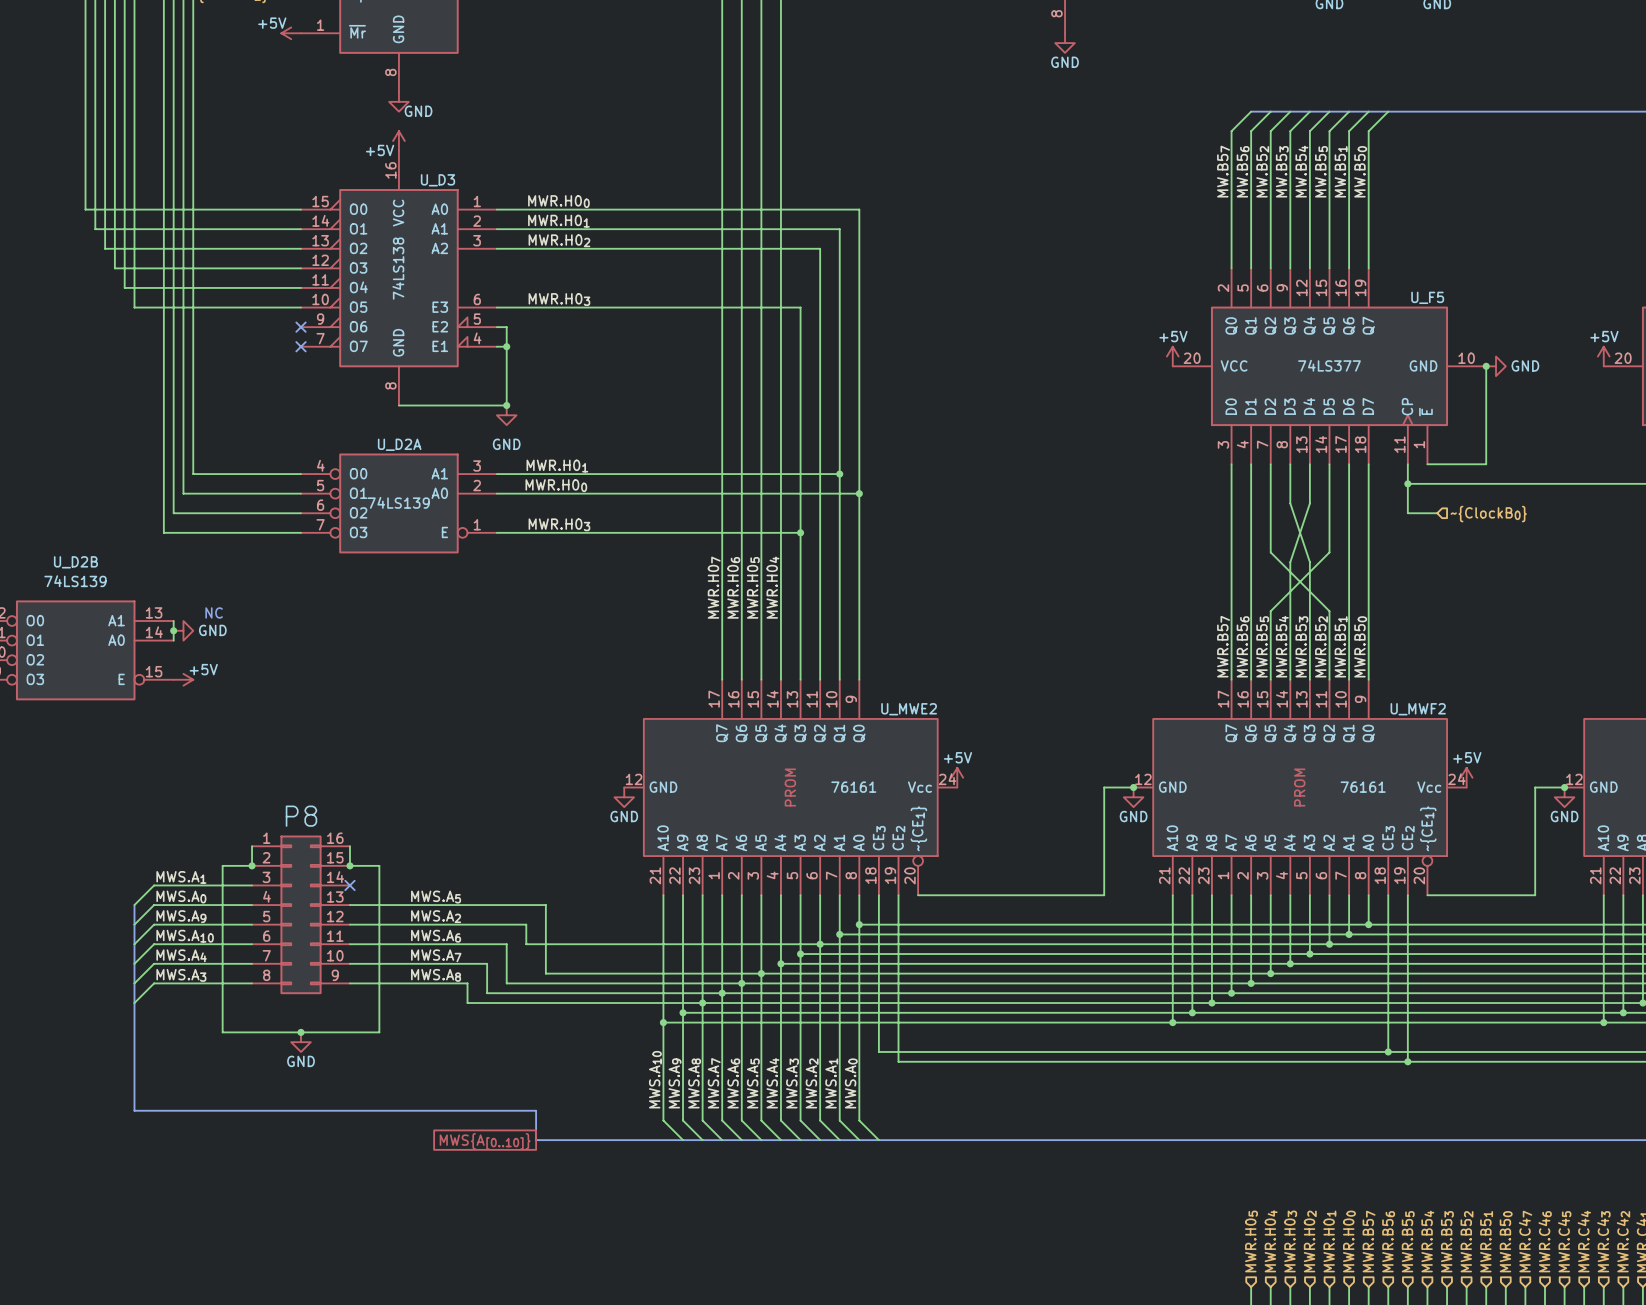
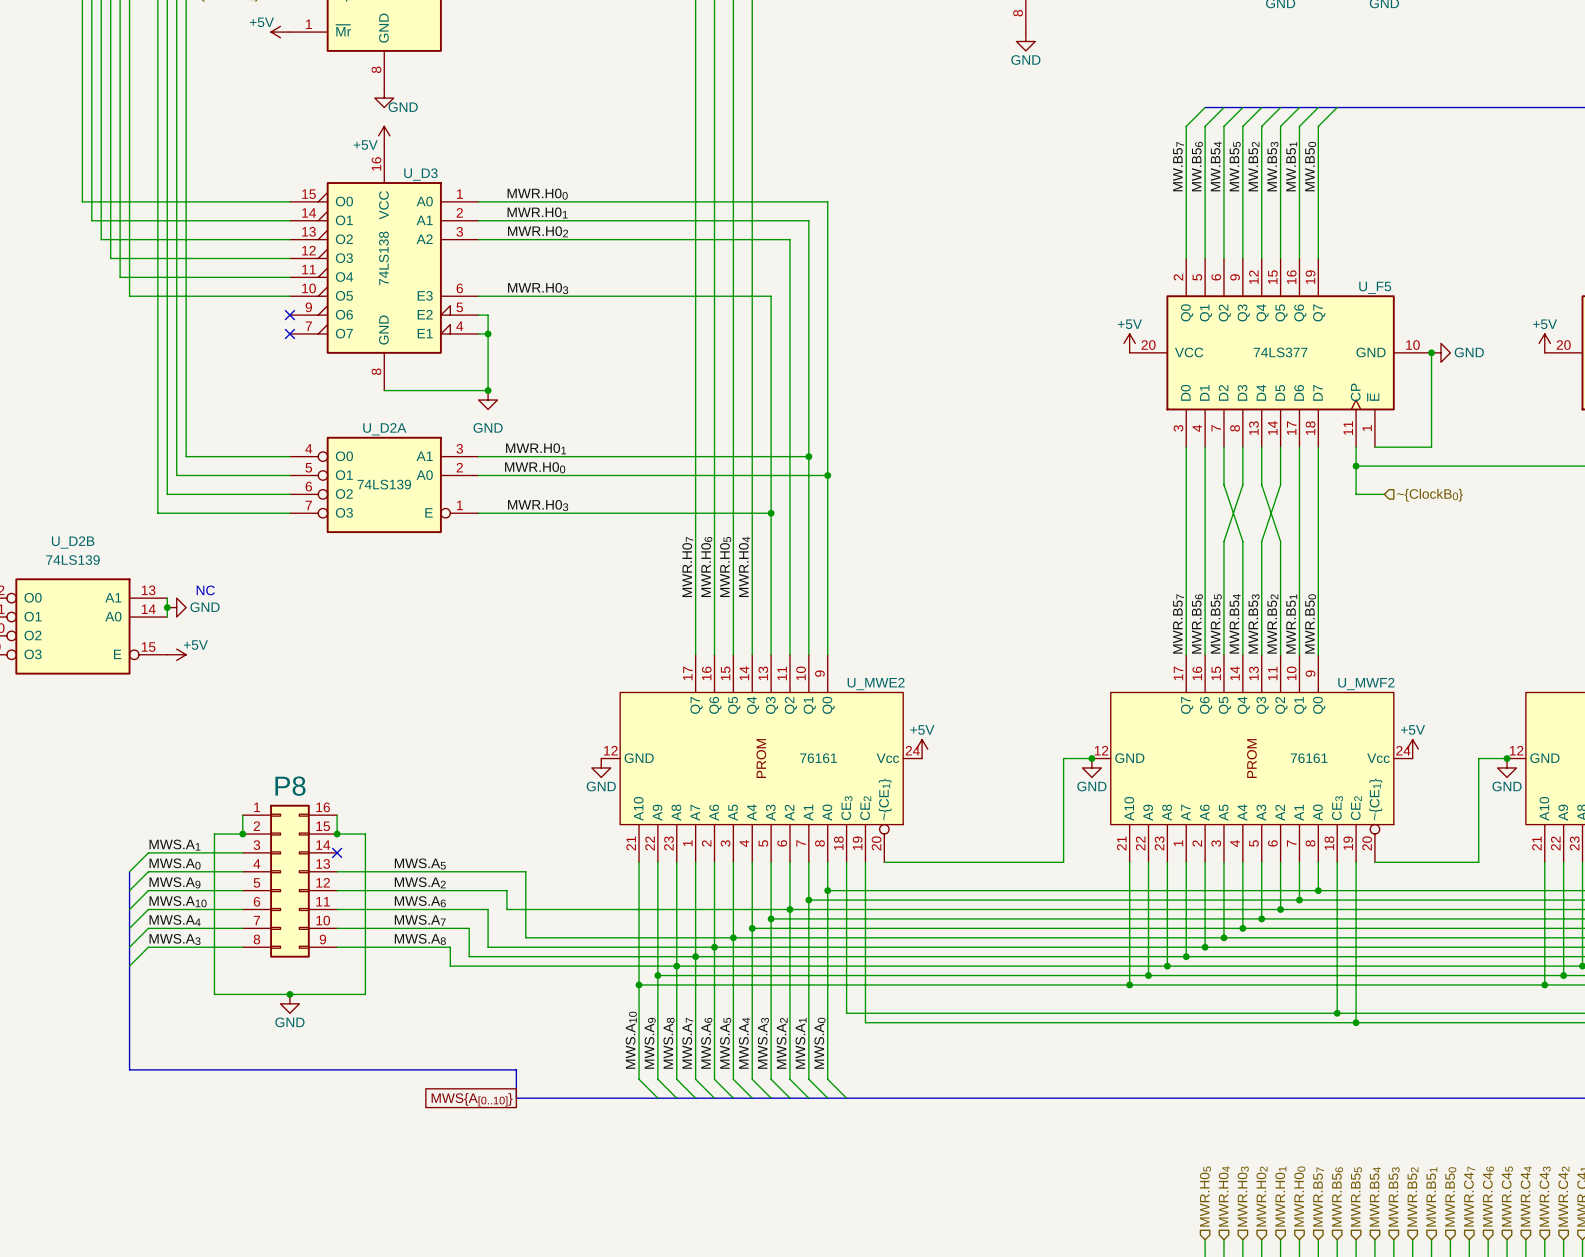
label: MW.B52 (1262, 171) -> MW.B54 (1216, 166)
label: MW.B53 (1282, 171) -> MW.B55 (1235, 166)
label: MW.B54 (1301, 171) -> MW.B52 (1254, 166)
label: MW.B55 (1321, 171) -> MW.B53 (1272, 166)
wire: (1270, 503) (1270, 552) (1329, 611) -> (1261, 484) (1280, 541) (1280, 588)
wire: (1290, 503) (1309, 562) -> (1280, 484) (1261, 541)
wire: (1309, 503) (1290, 562) -> (1223, 484) (1242, 541)
wire: (1329, 503) (1329, 552) (1270, 611) -> (1242, 484) (1223, 541) (1223, 588)

